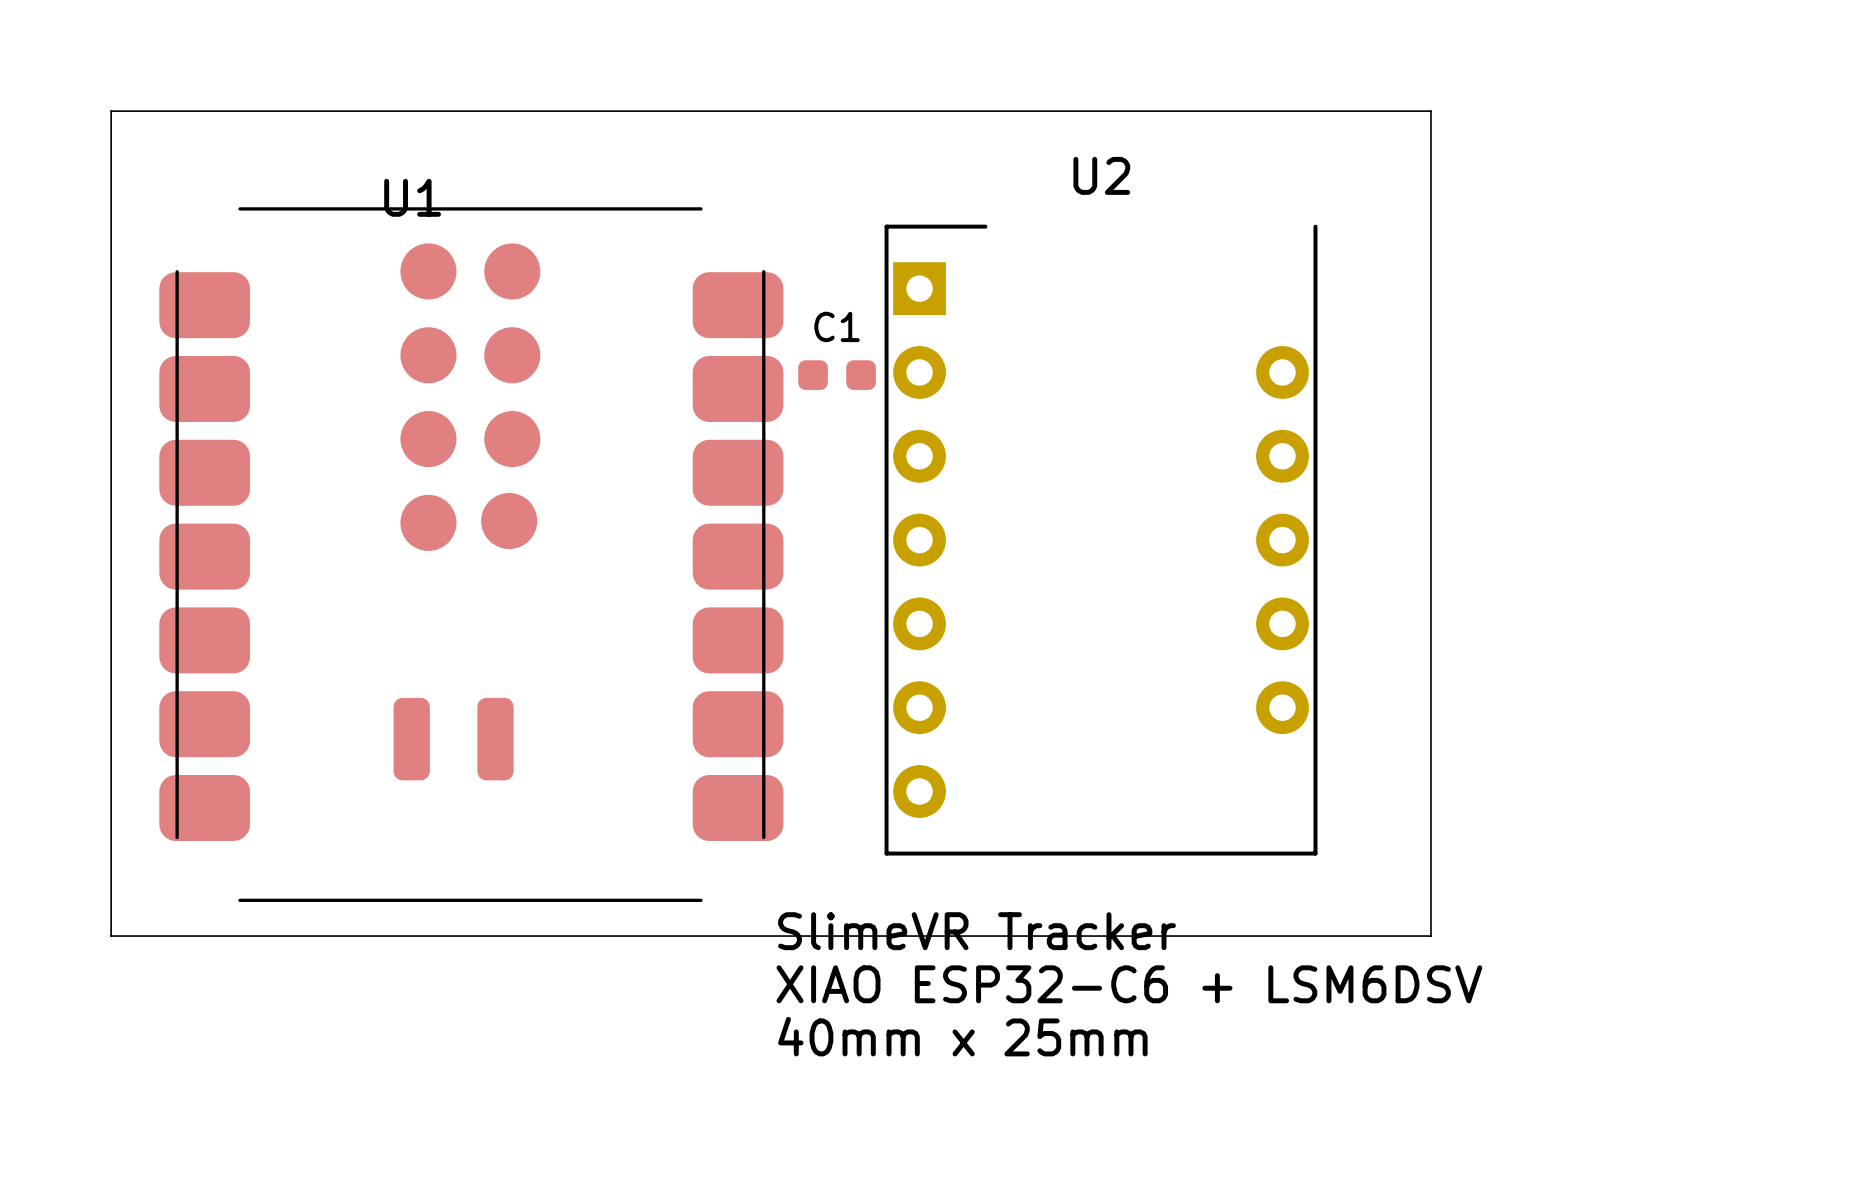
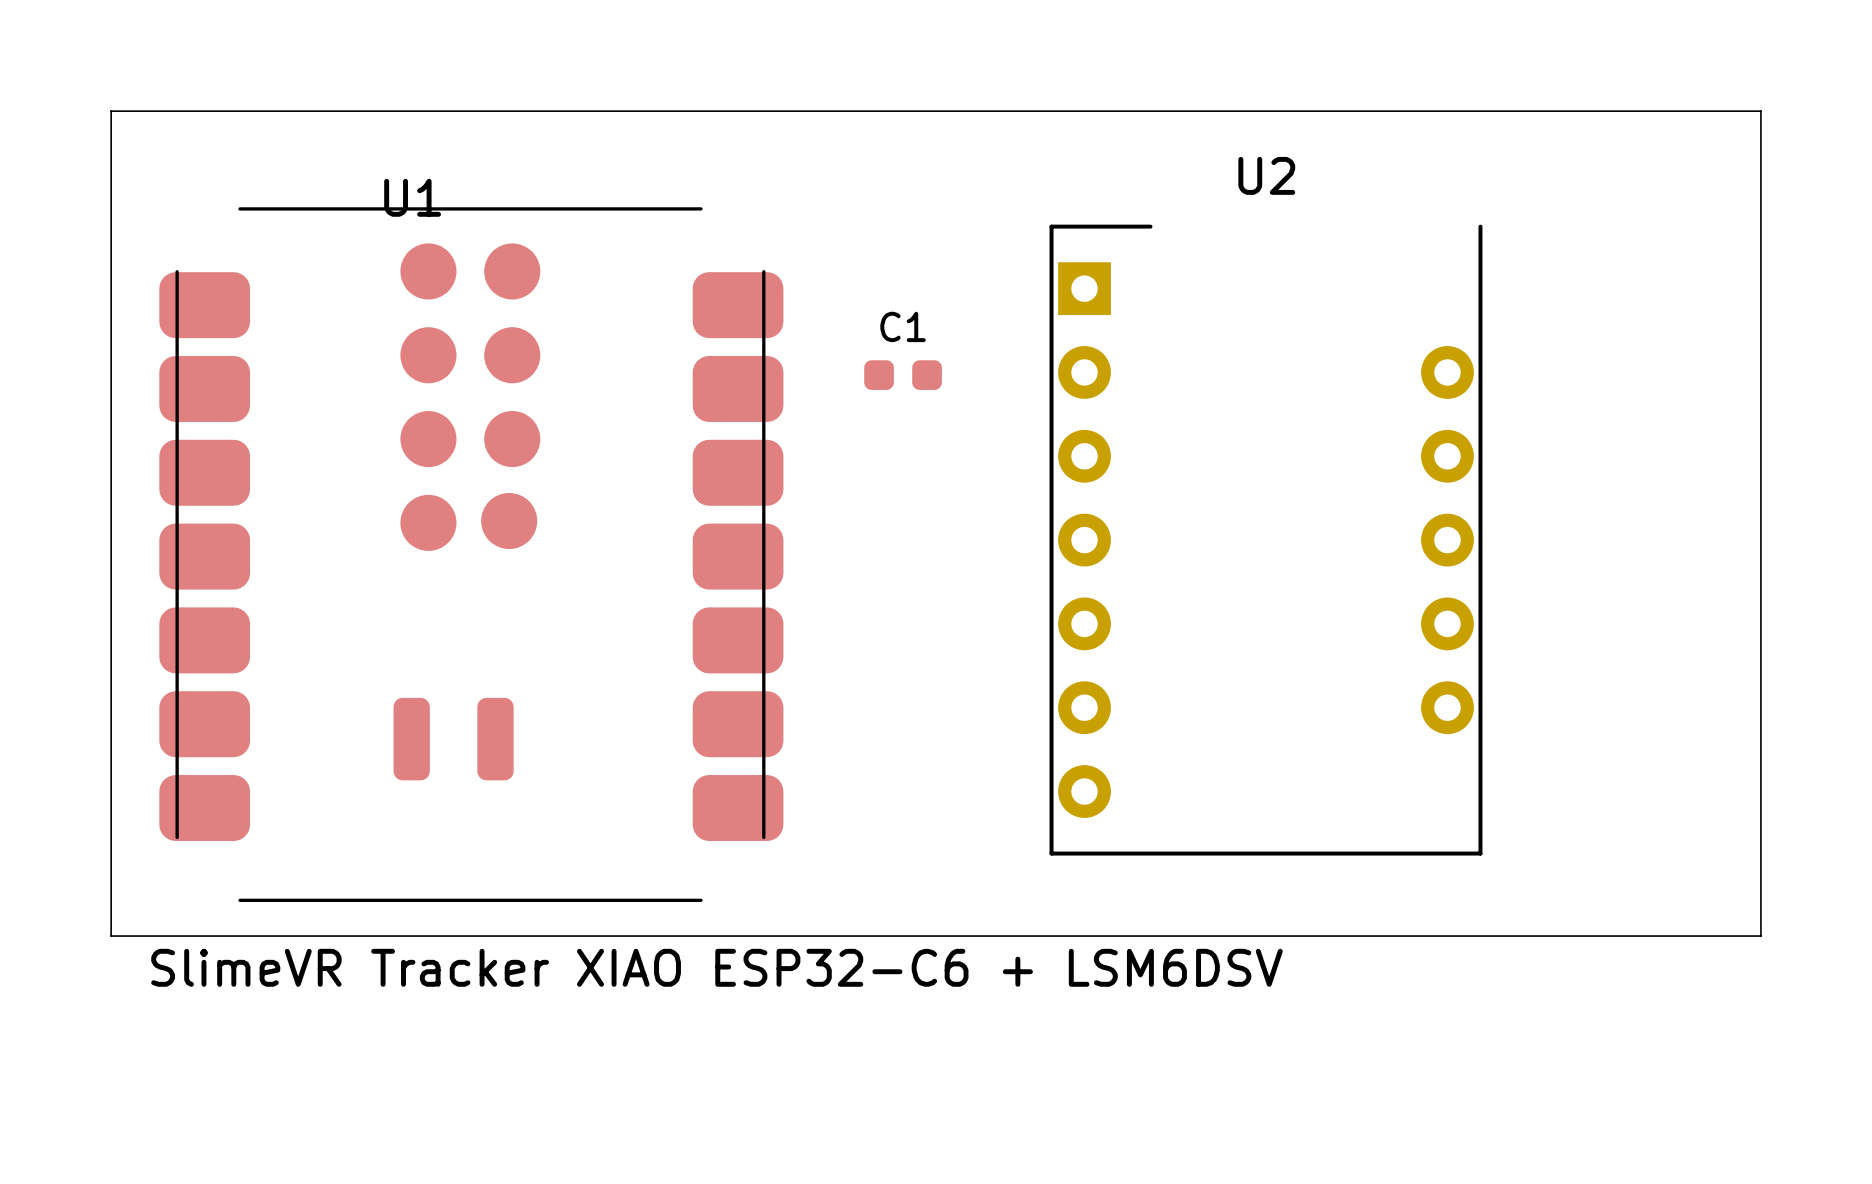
board edge: (1430, 111) (1430, 936) -> (1430, 111) (1760, 111) (1760, 936) (1430, 936)
C1 position: (837, 375) -> (903, 375)
U2 position: (1101, 540) -> (1266, 540)
text: SlimeVR Tracker (977, 931) -> none
text: XIAO ESP32-C6 + LSM6DSV (1129, 984) -> SlimeVR Tracker XIAO ESP32-C6 + LSM6DSV (716, 967)
text: 40mm x 25mm (962, 1036) -> none

